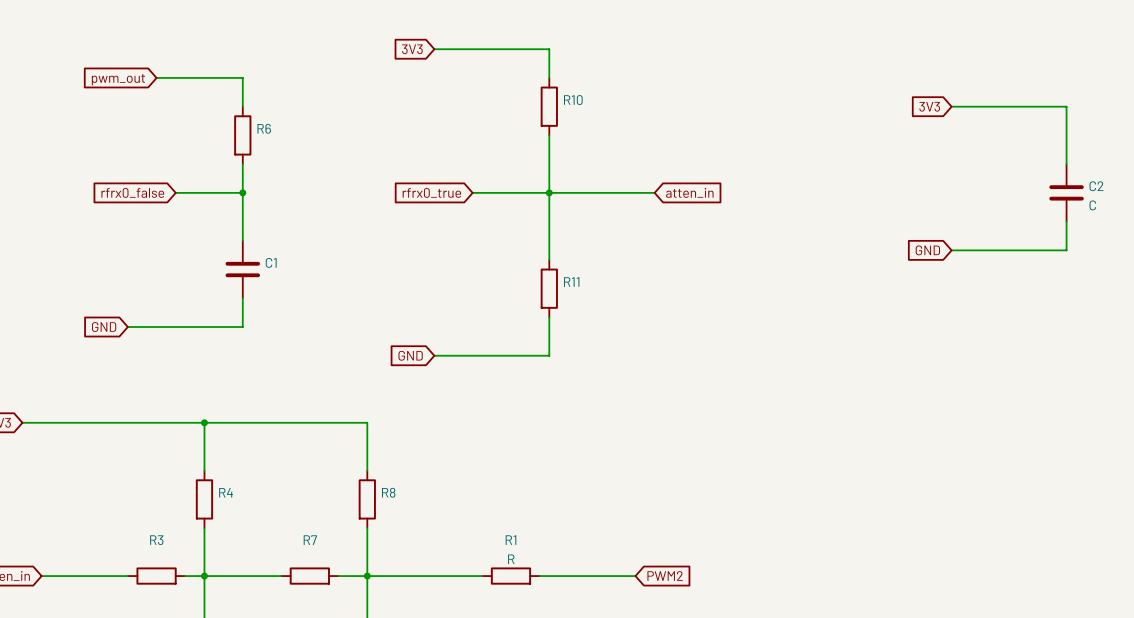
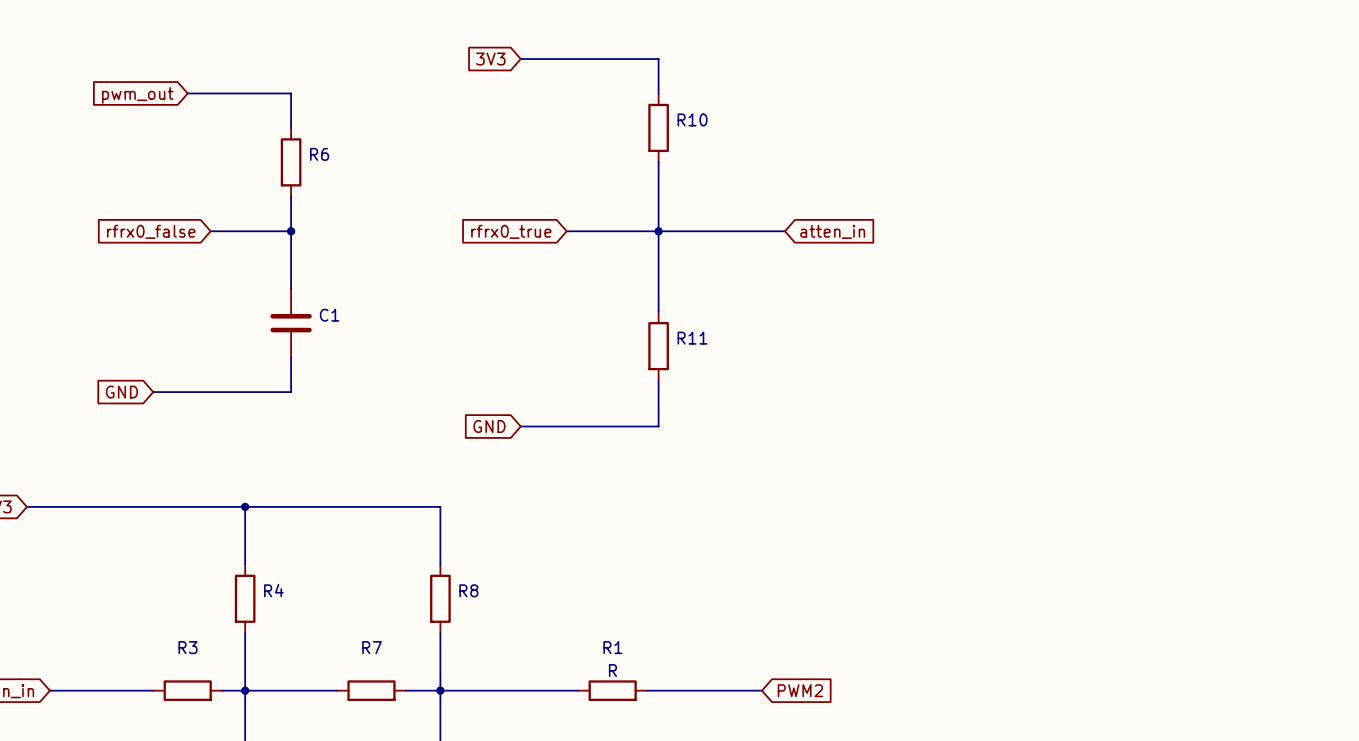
global label: 3V3 (929, 106) -> none
wire: (951, 106) (1066, 106) (1066, 164) -> none
C2: C (1066, 192) -> none
wire: (1066, 221) (1066, 250) (951, 250) -> none
global label: GND (927, 250) -> none

